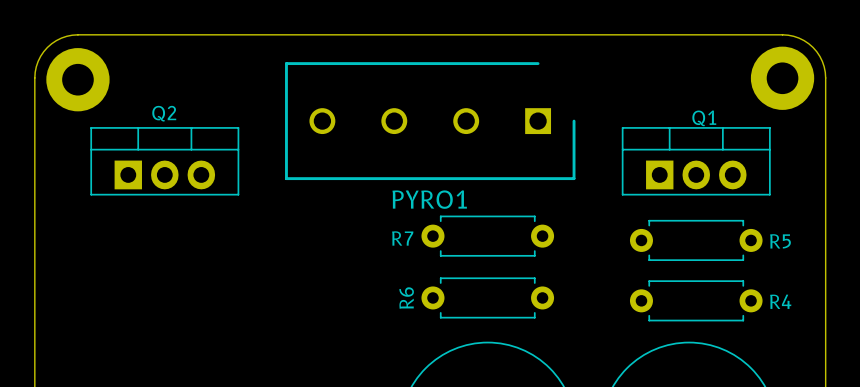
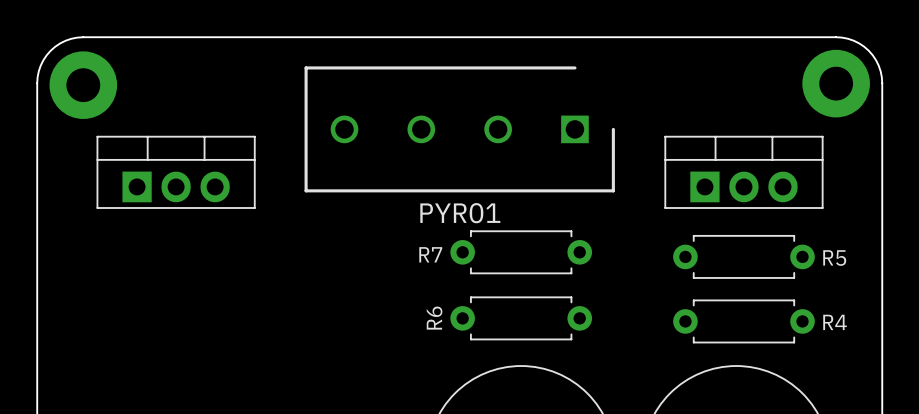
Q2 name: Q2 (164, 113) -> none
Q1 name: Q1 (704, 118) -> none

